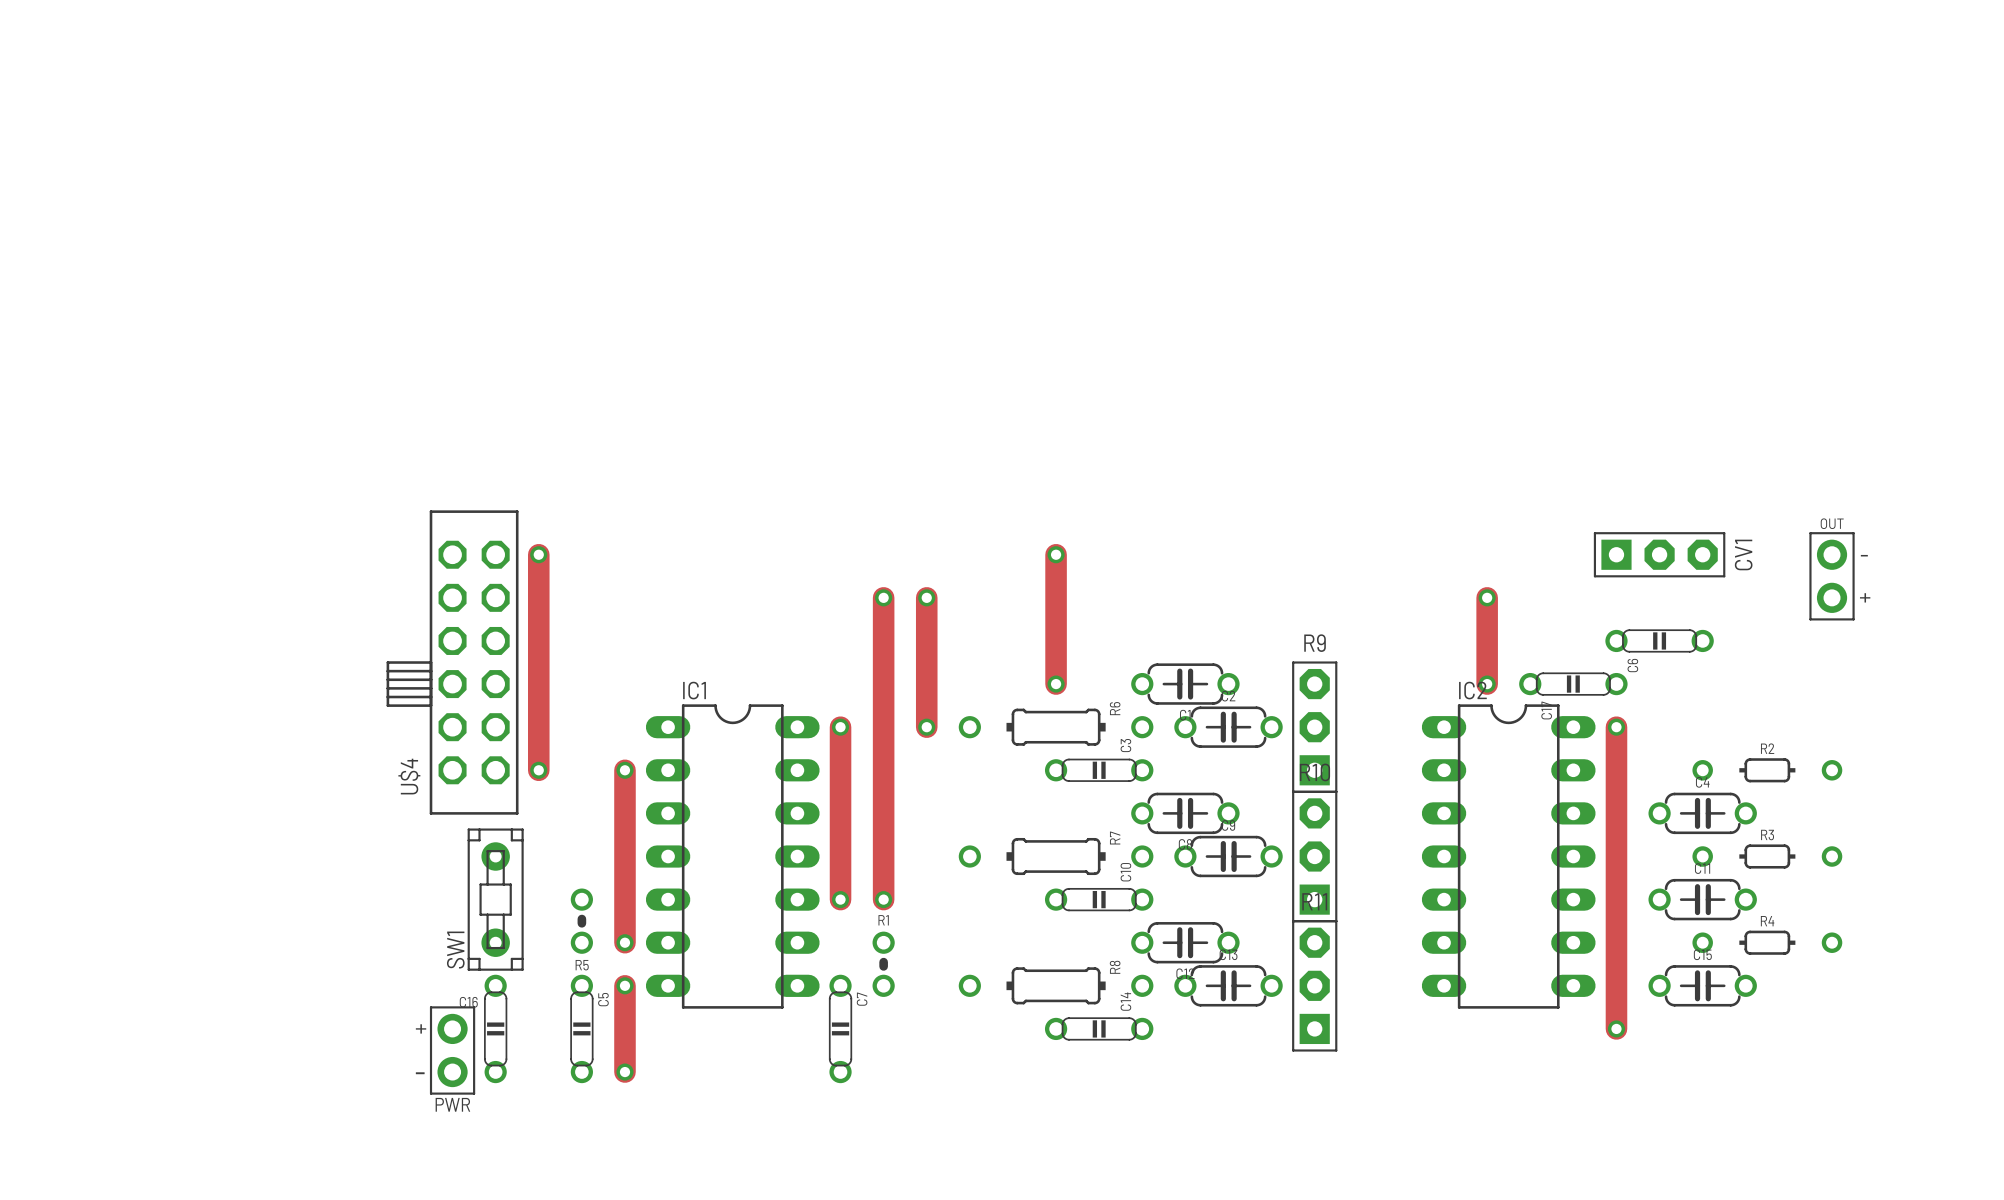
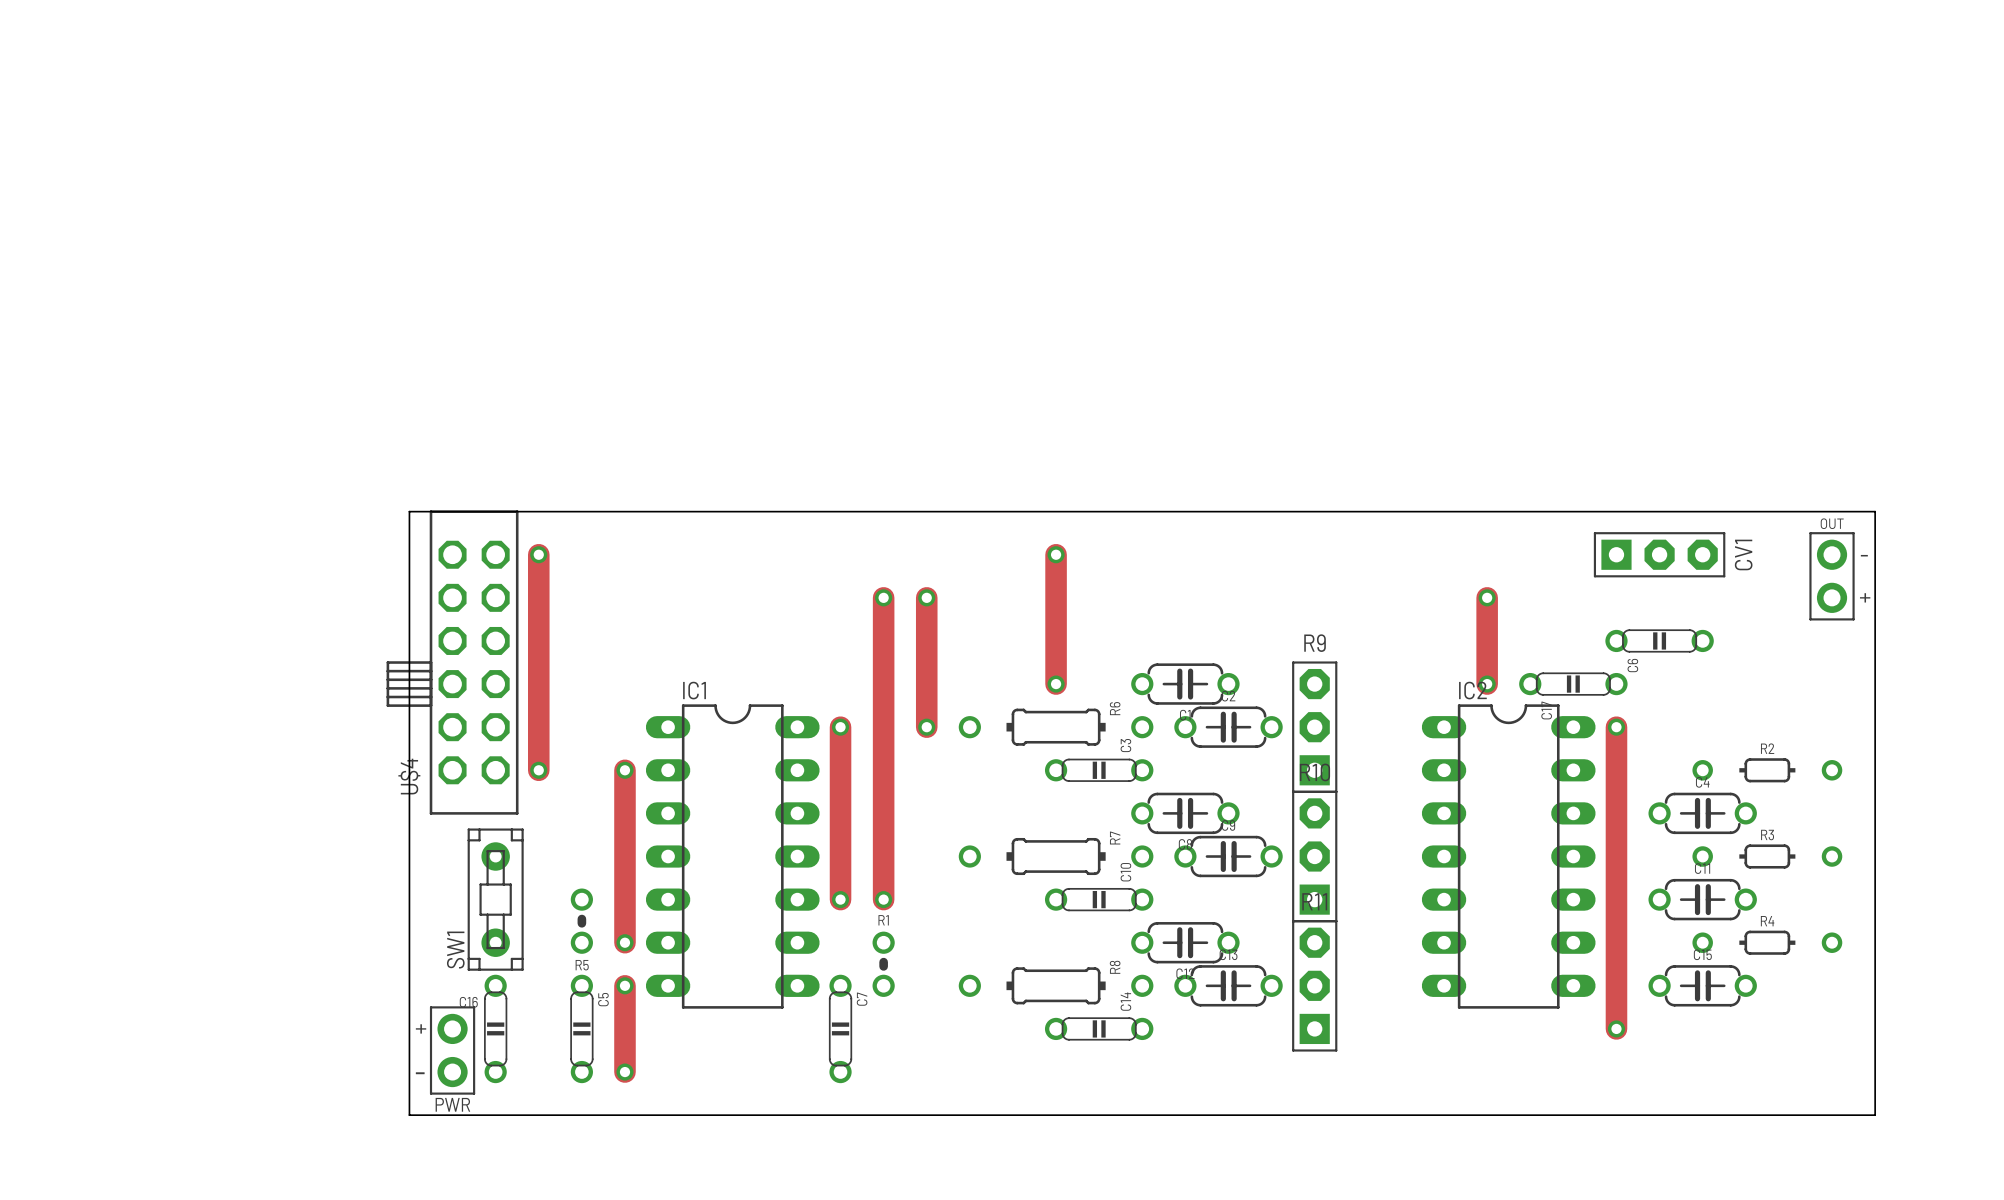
board edge: none -> (409, 511) (1875, 511) (1875, 1115) (409, 1115) (409, 511)

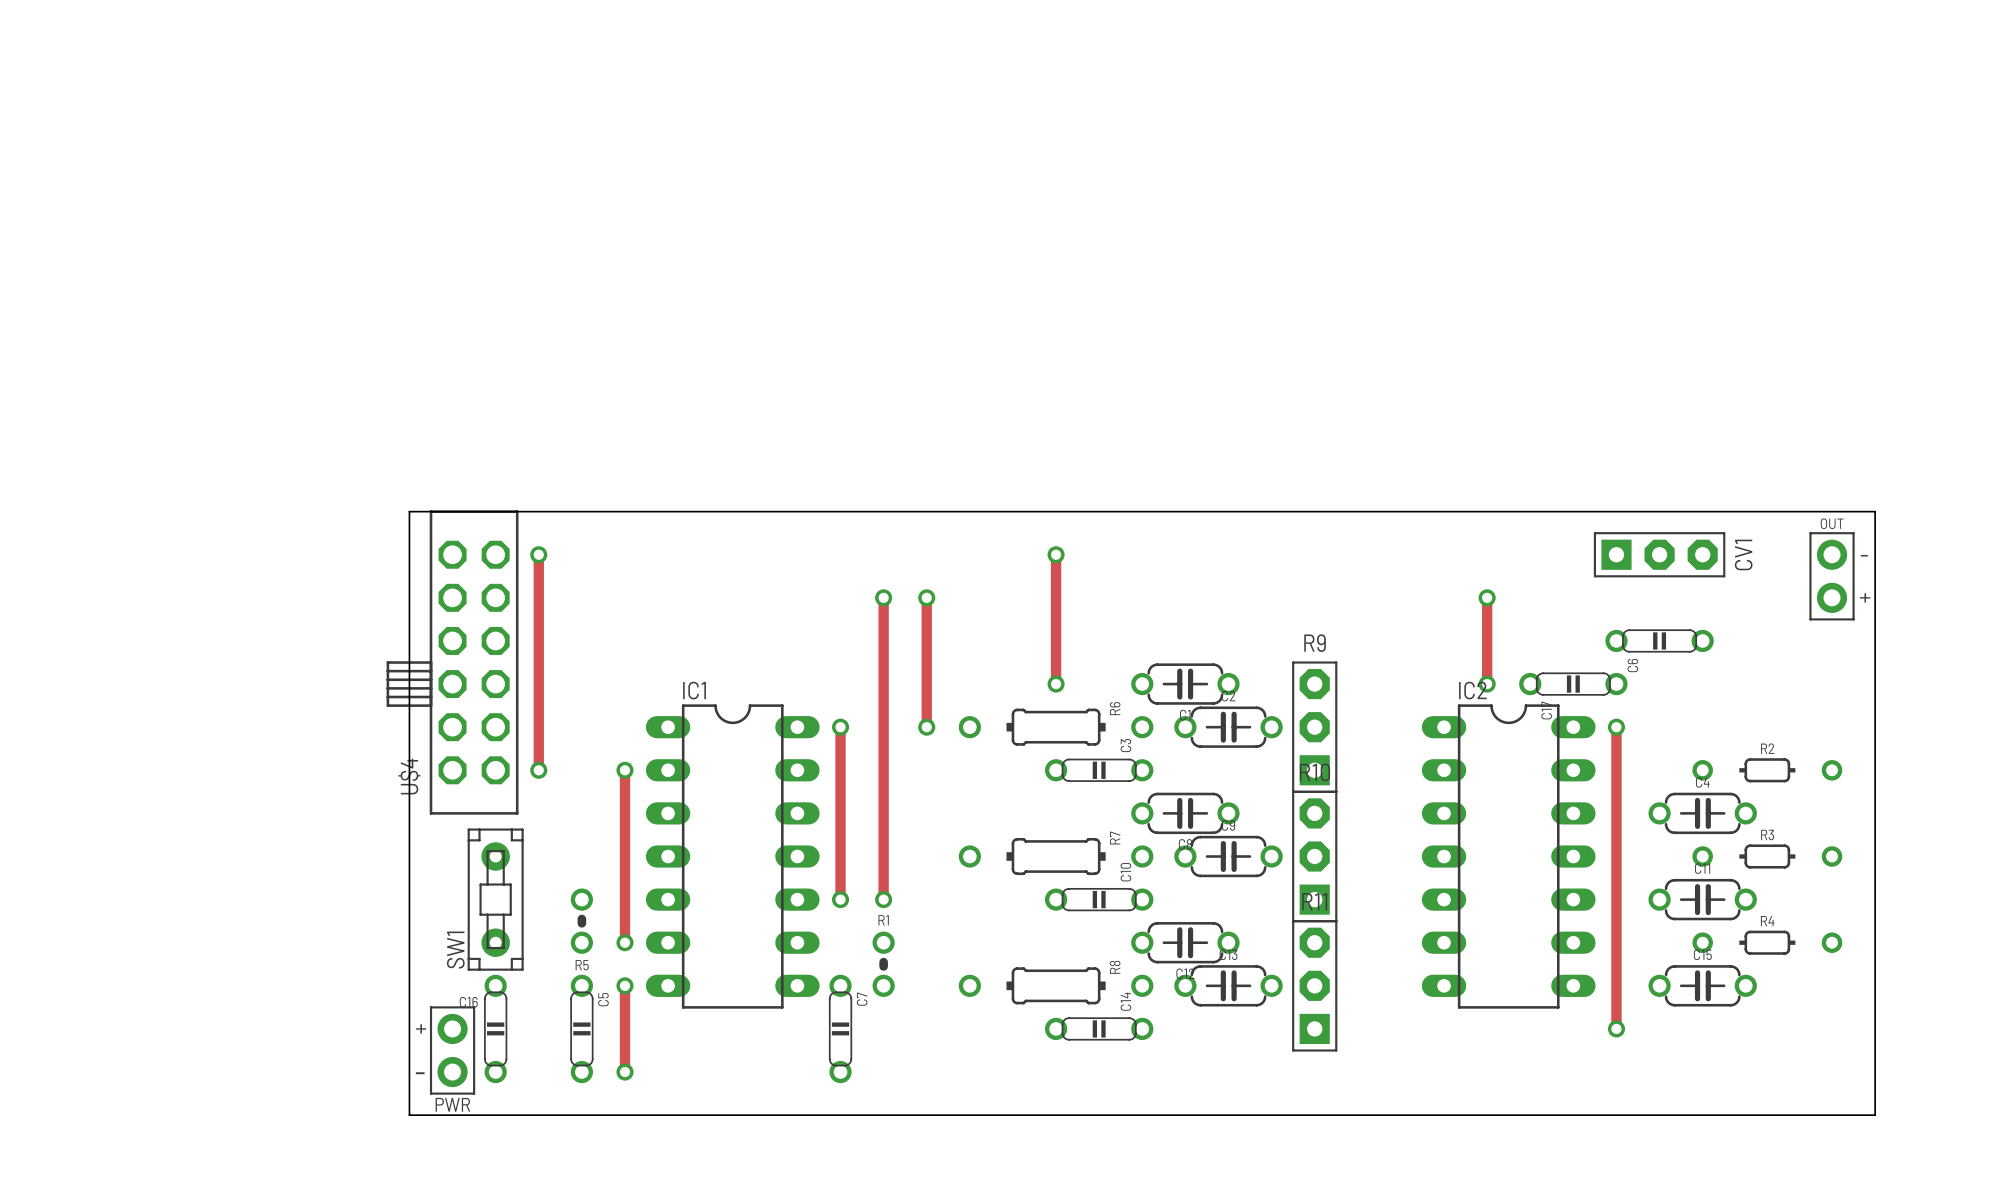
track width: thick (538, 554) (538, 770) -> thin (538, 554) (538, 770)
track width: thick (1056, 554) (1056, 684) -> thin (1056, 554) (1056, 684)
track width: thick (883, 597) (883, 899) -> thin (883, 597) (883, 899)
track width: thick (926, 597) (926, 727) -> thin (926, 597) (926, 727)
track width: thick (1487, 597) (1487, 684) -> thin (1487, 597) (1487, 684)
track width: thick (840, 727) (840, 899) -> thin (840, 727) (840, 899)
track width: thick (1616, 727) (1616, 1028) -> thin (1616, 727) (1616, 1028)
track width: thick (624, 770) (624, 942) -> thin (624, 770) (624, 942)
track width: thick (624, 985) (624, 1072) -> thin (624, 985) (624, 1072)

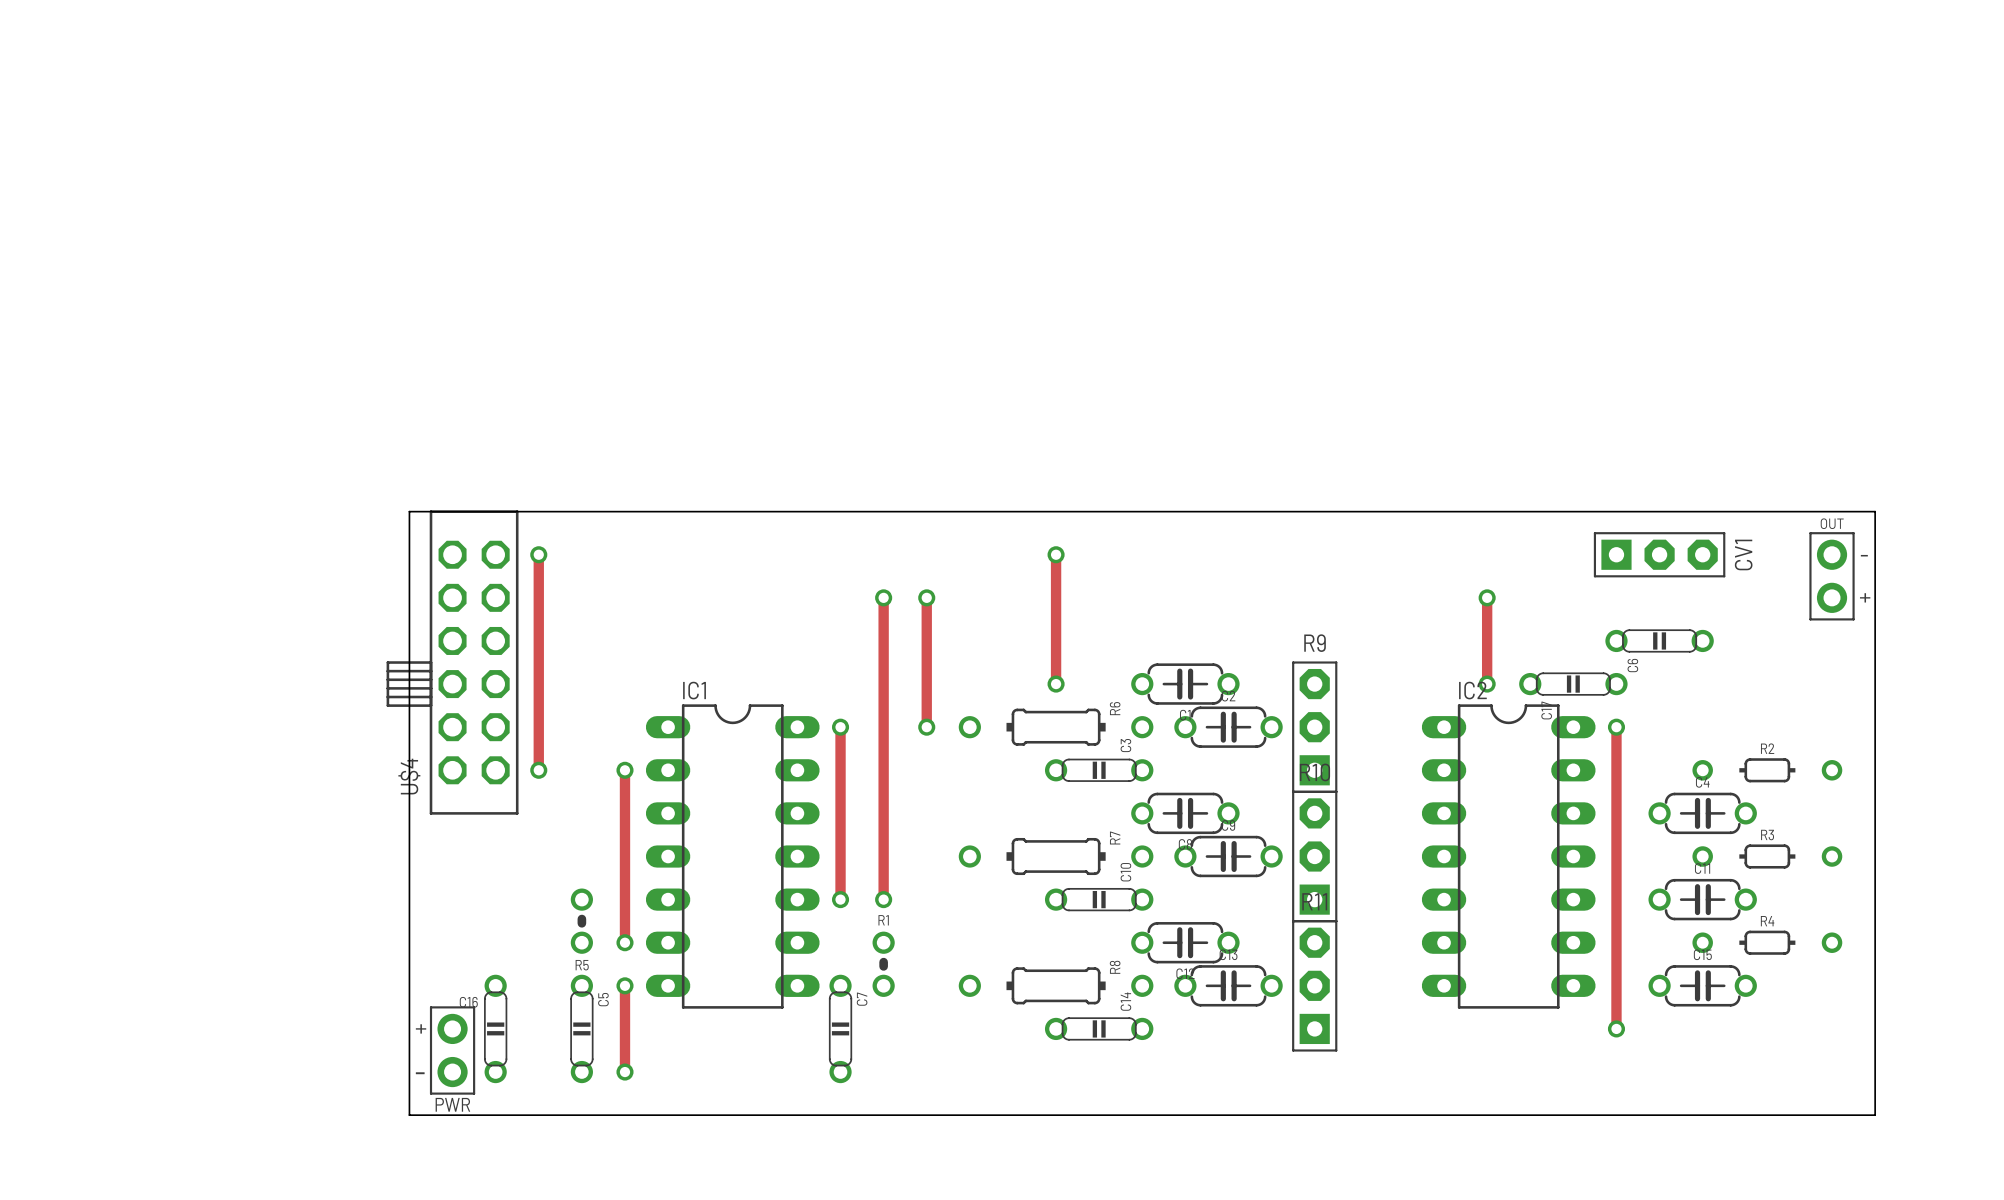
SW1: (495, 899) -> none

